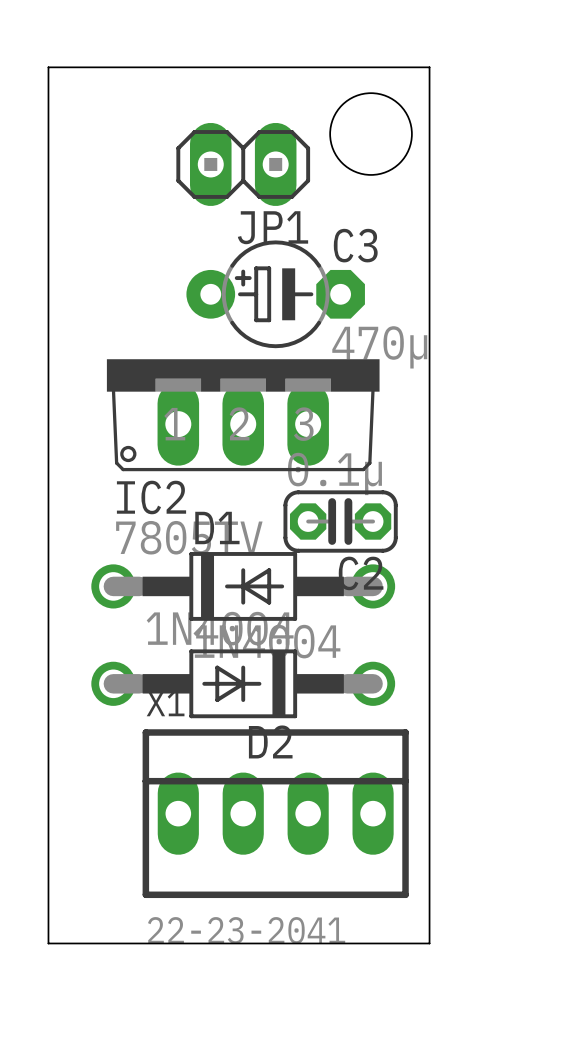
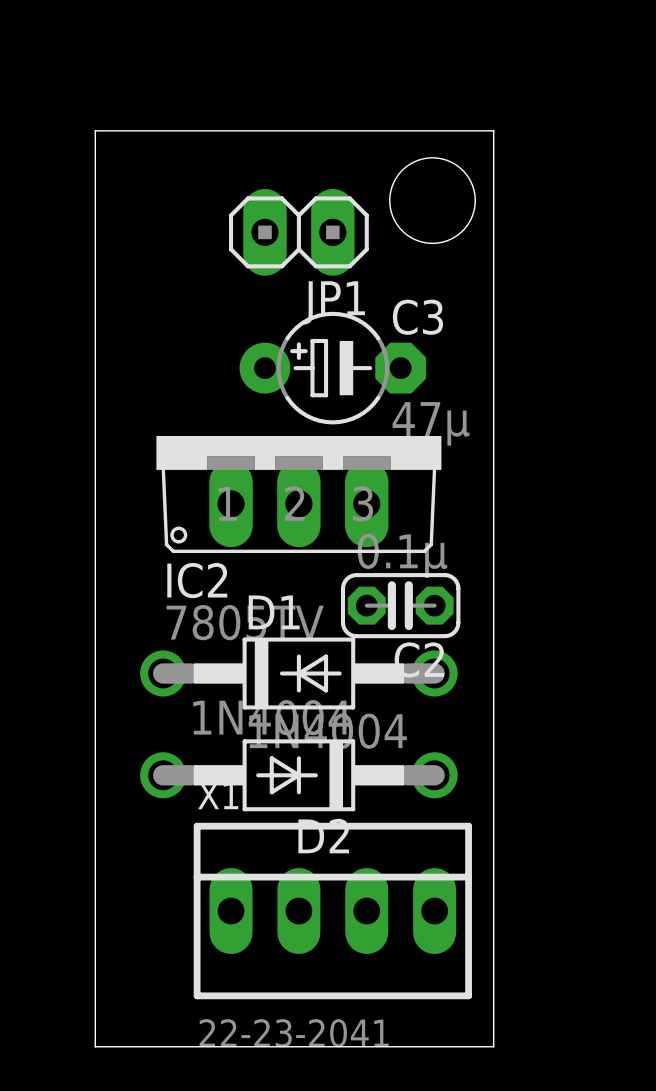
C3 value: 470µ (379, 347) -> 47µ (431, 423)

